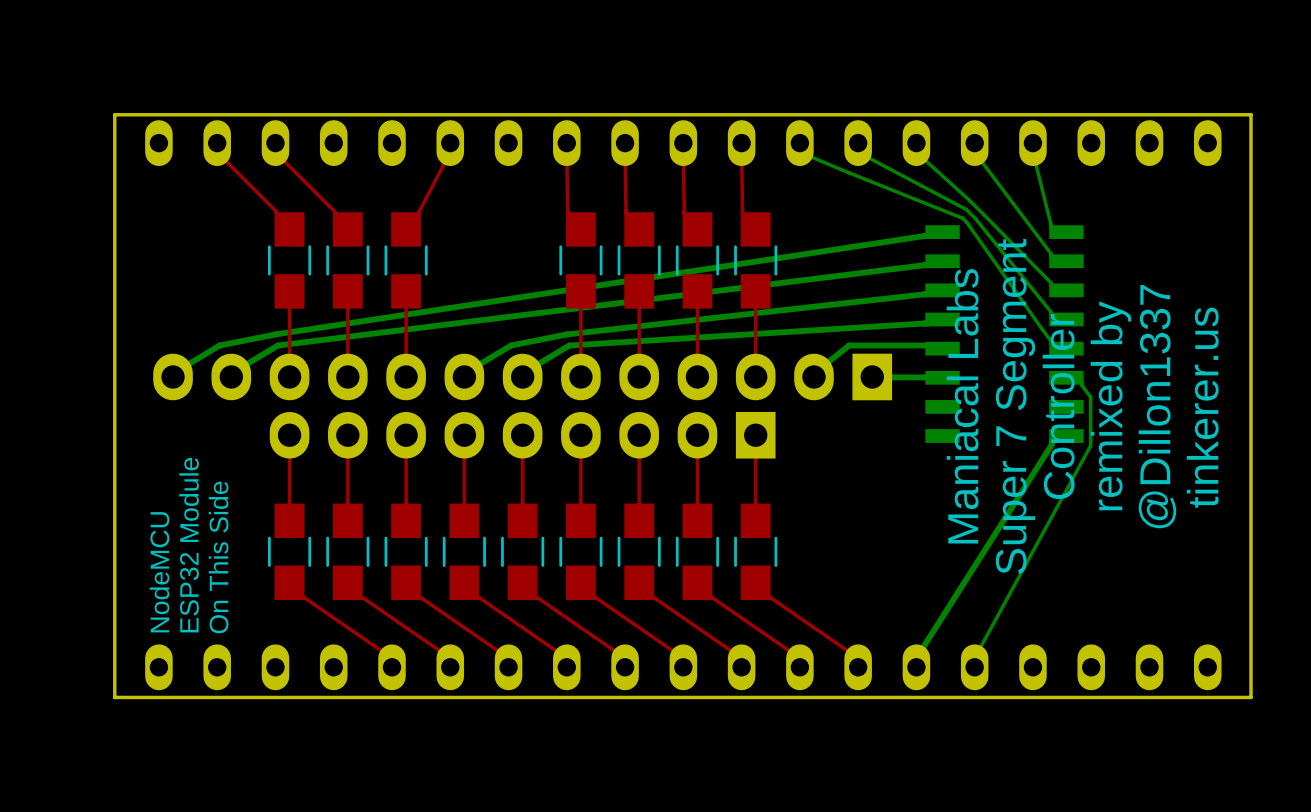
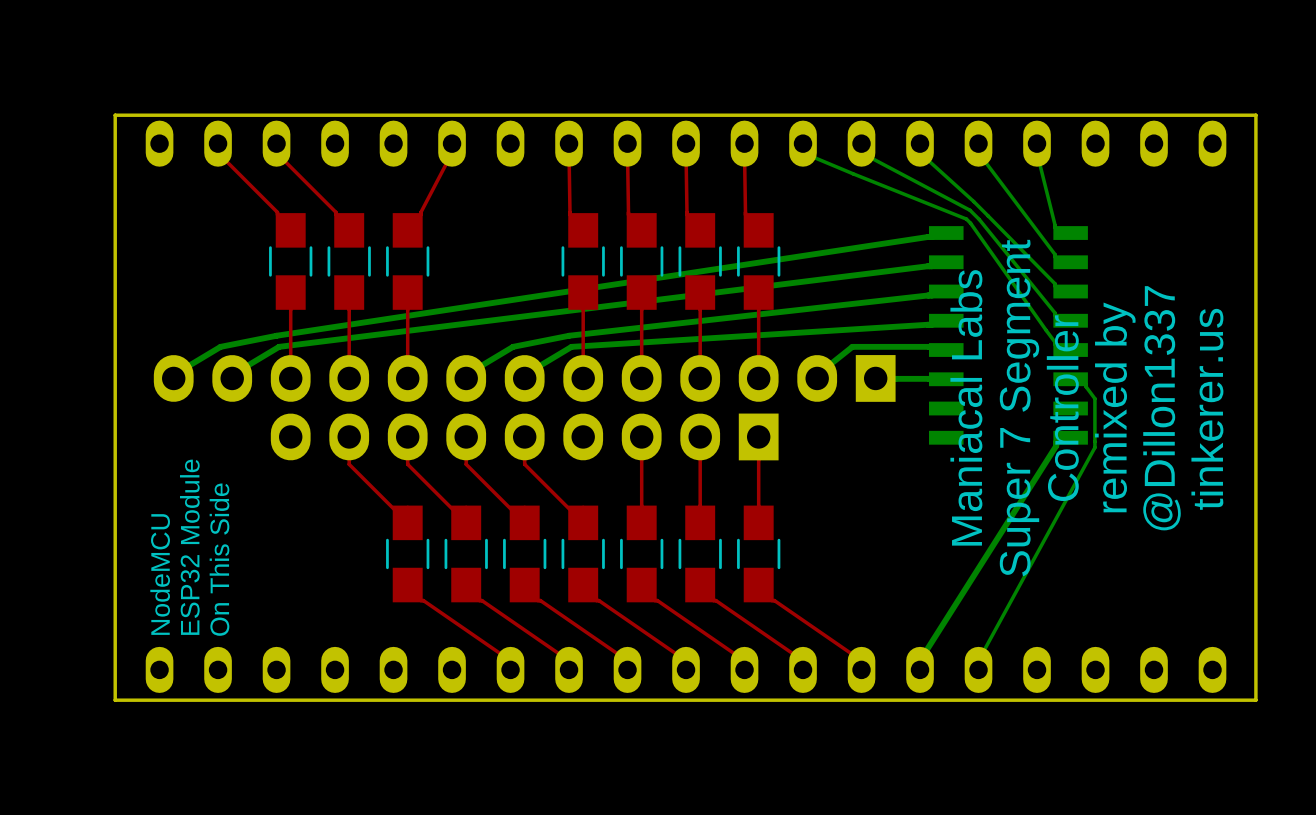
top track: (289, 435) (289, 520) -> none
top track: (580, 435) (580, 505) -> none
top track: (347, 462) (347, 520) -> (349, 464) (407, 522)
top track: (406, 462) (406, 505) -> (407, 464) (466, 522)
top track: (464, 462) (464, 505) -> (466, 464) (524, 522)
top track: (522, 462) (522, 505) -> (524, 464) (583, 522)
part: (289, 551) -> none
part: (347, 551) -> none
top track: (289, 582) (302, 598) (392, 658) (392, 667) -> none
top track: (347, 582) (361, 598) (450, 658) (450, 667) -> none

